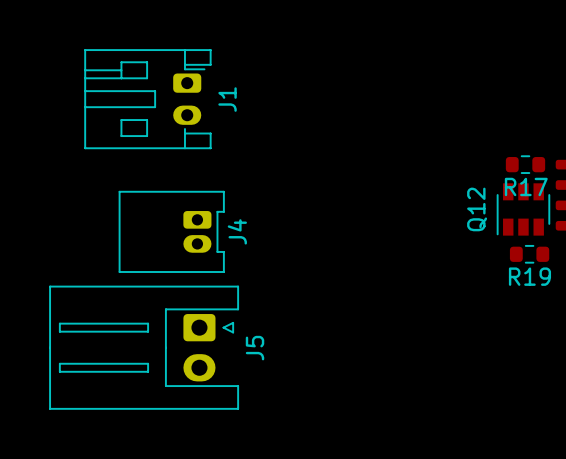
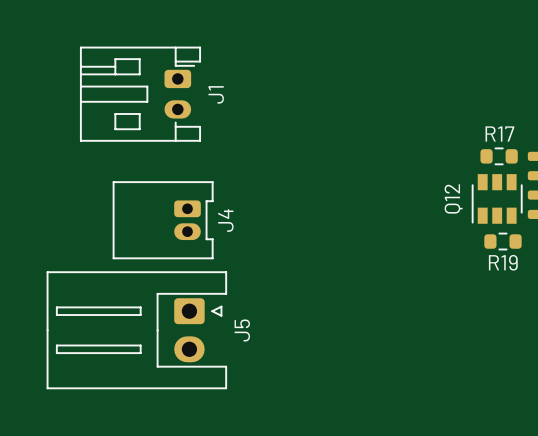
R17 name position: R17 (526, 186) -> R17 (499, 134)

